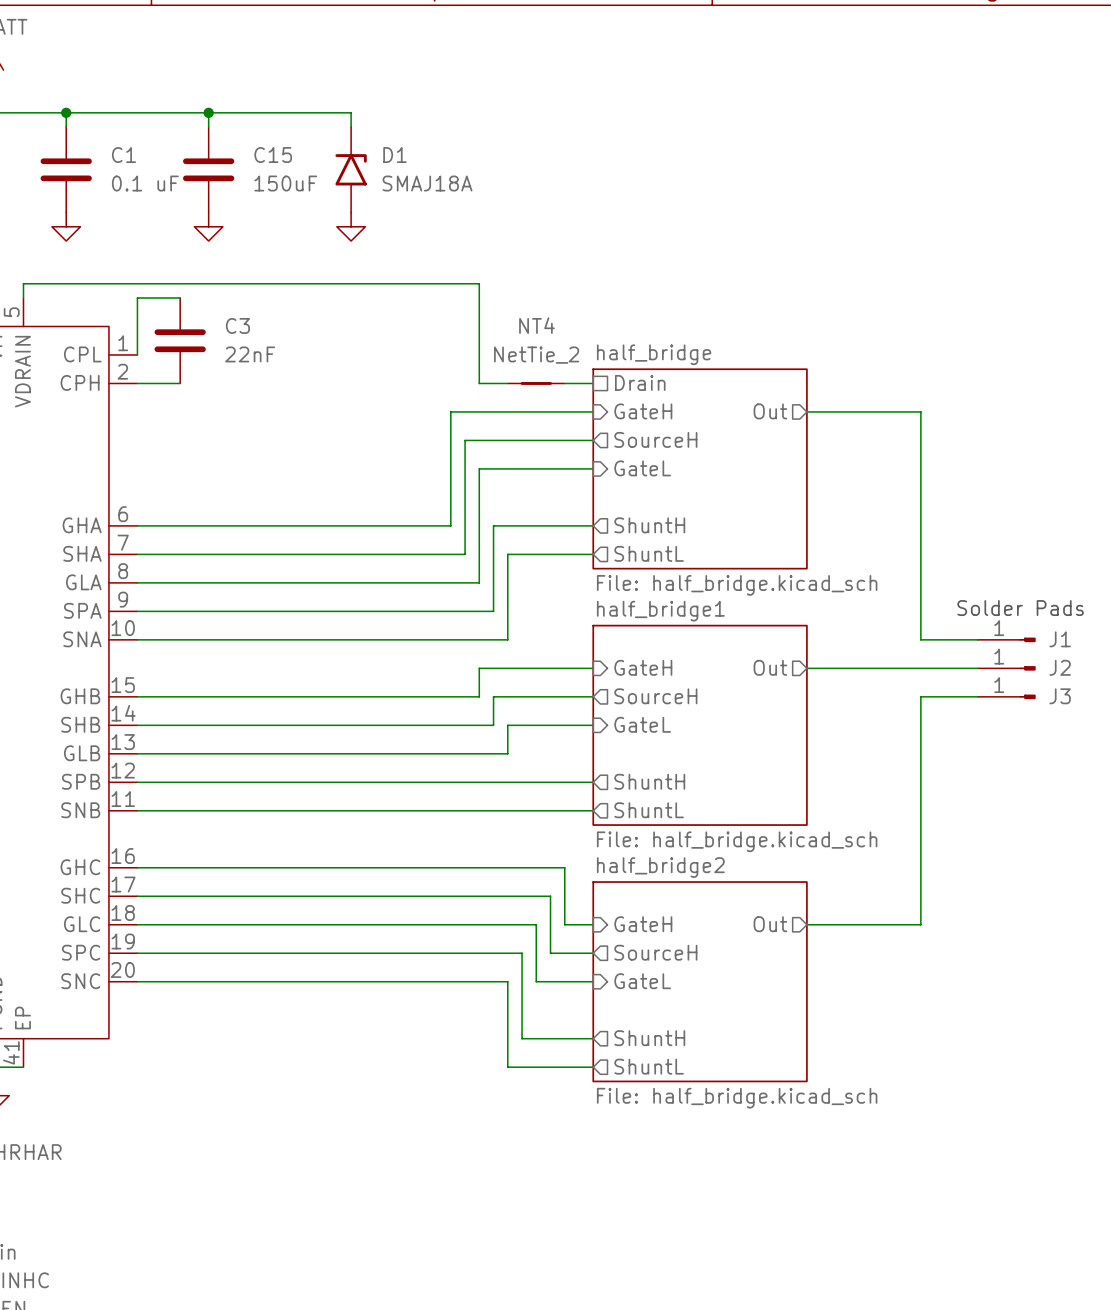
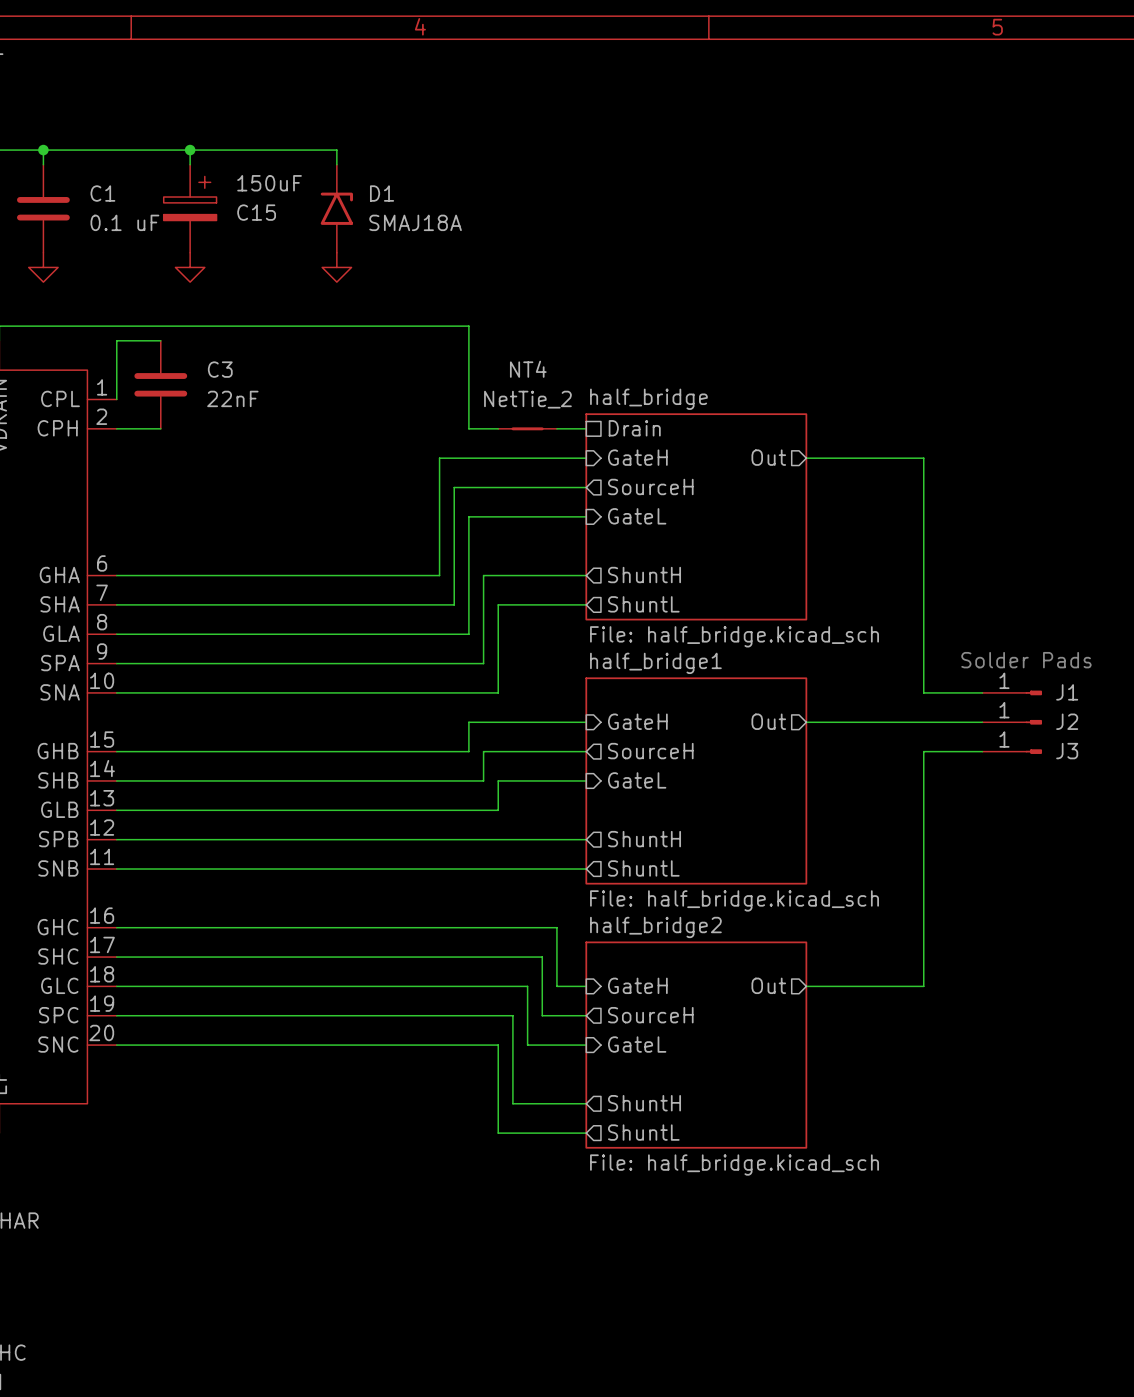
C15 symbol: [183, 127, 235, 213] -> [163, 164, 217, 253]
C15 value position: 150uF (285, 183) -> 150uF (269, 183)

